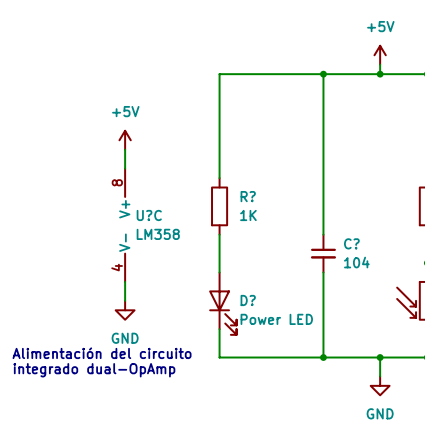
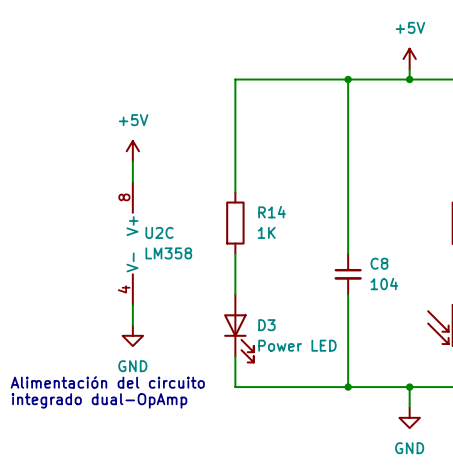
R? name: R? (248, 196) -> R14 (272, 212)
U?C name: U?C (149, 215) -> U2C (159, 232)
C? name: C? (351, 243) -> C8 (379, 263)
D? name: D? (248, 300) -> D3 (266, 325)

